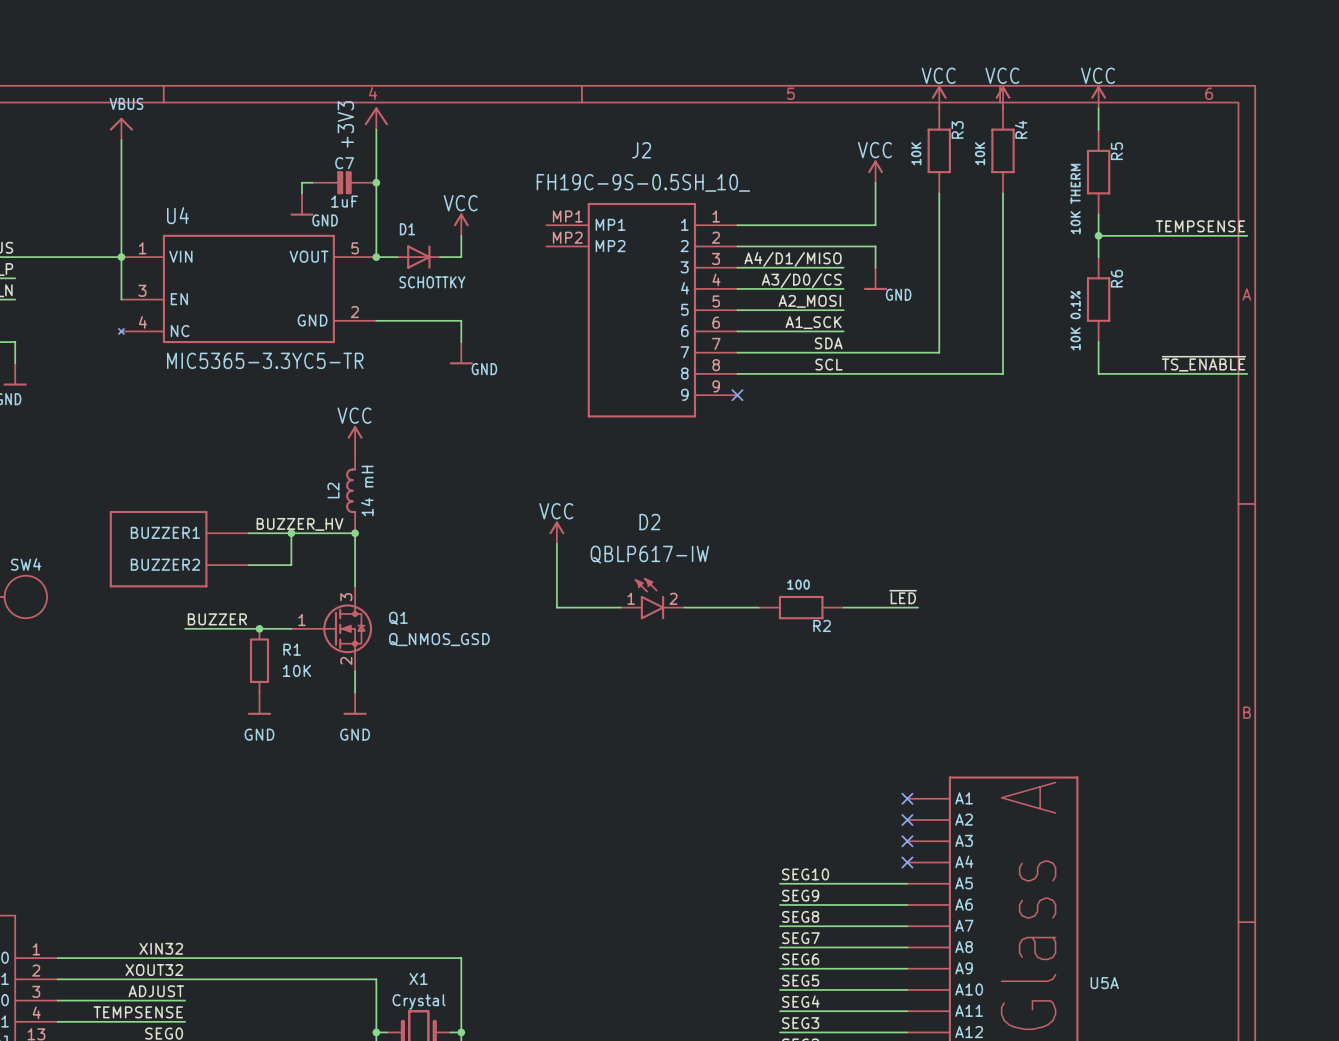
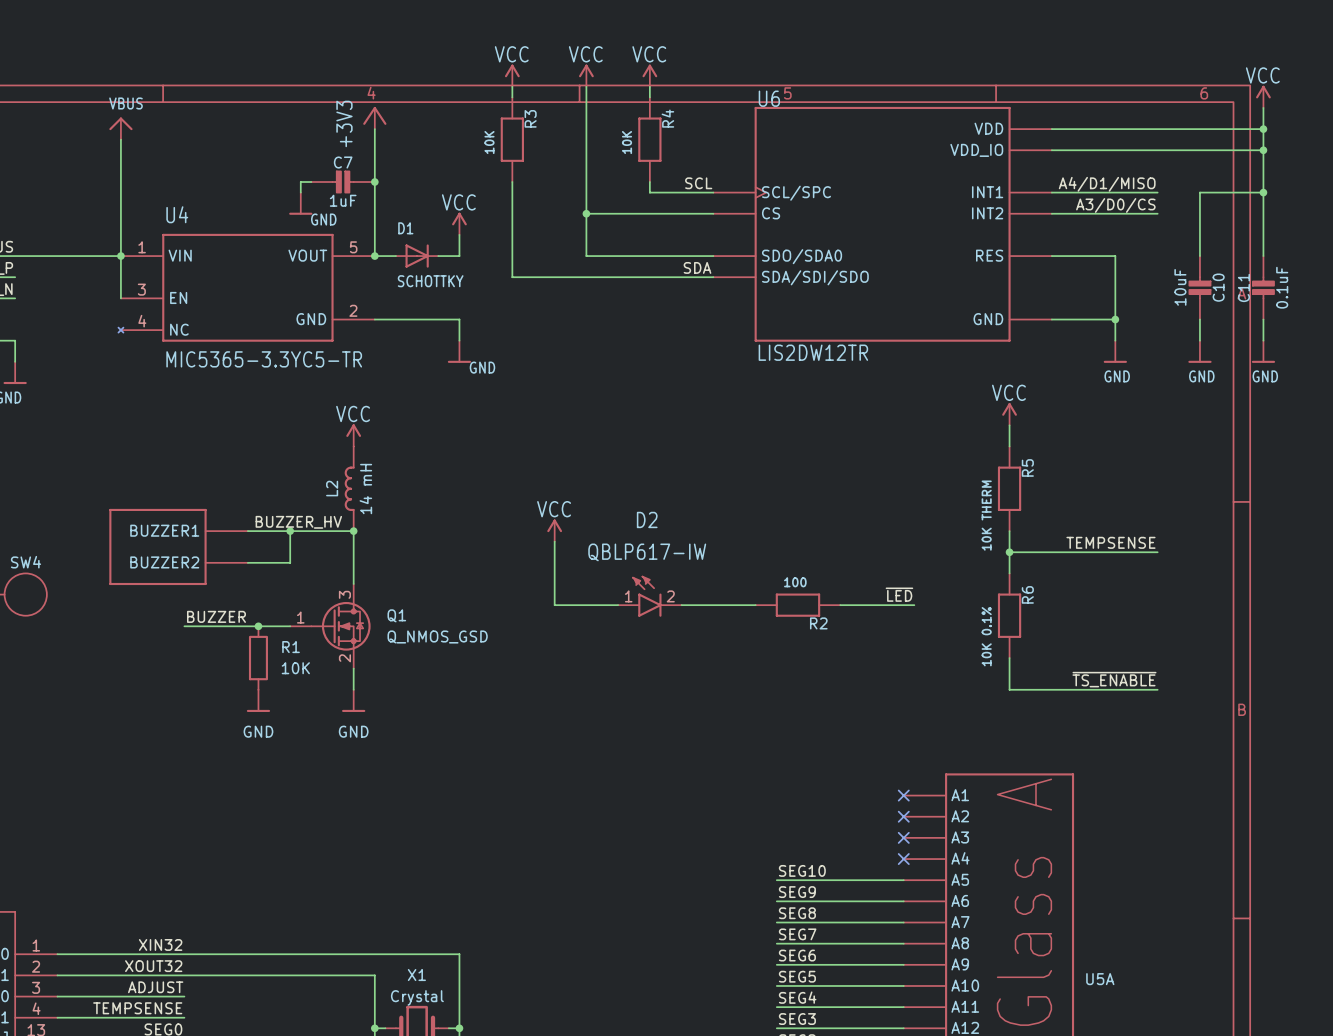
power symbol: none -> VCC (512, 75)
power symbol: none -> VCC (586, 75)
power symbol: none -> VCC (649, 75)
wire: none -> (512, 86) (512, 97)
wire: none -> (586, 86) (586, 256) (713, 256)
wire: none -> (649, 86) (649, 97)
power symbol: VCC (939, 97) -> none
power symbol: VCC (1003, 97) -> none
power symbol: VCC (1098, 97) -> none
power symbol: none -> VCC (1263, 96)
wire: (1098, 108) (1098, 129) -> none
wire: none -> (1263, 107) (1263, 256)
wire: none -> (1051, 129) (1263, 129)
junction: none -> (1263, 129)
R3 position: (939, 150) -> (512, 139)
R4 position: (1003, 150) -> (649, 139)
wire: none -> (1051, 150) (1263, 150)
junction: none -> (1263, 150)
power symbol: VCC (875, 171) -> none
R5 position: (1098, 172) -> (1009, 488)
wire: none -> (512, 182) (512, 277) (713, 277)
wire: none -> (649, 182) (649, 192) (713, 192)
wire: (875, 182) (875, 225) (737, 225) -> none
label: none -> SCL (698, 183)
label: none -> A4/D1/MISO (1107, 184)
wire: (939, 193) (939, 352) (737, 352) -> none
wire: (1003, 193) (1003, 373) (737, 373) -> none
wire: none -> (1051, 192) (1157, 192)
wire: none -> (1263, 192) (1199, 192) (1199, 256)
junction: none -> (1263, 192)
label: none -> A3/D0/CS (1115, 205)
wire: none -> (586, 213) (713, 213)
junction: none -> (586, 213)
wire: none -> (1051, 213) (1157, 213)
wire: (1098, 214) (1098, 257) -> none
U6: none -> LIS2DW12TR (882, 224)
label: TEMPSENSE (1200, 226) -> none
wire: (1098, 235) (1247, 235) -> none
junction: (1098, 235) -> none
wire: (737, 246) (875, 246) (875, 267) -> none
wire: none -> (1051, 256) (1115, 256) (1115, 340)
label: A4/D1/MISO (793, 259) -> none
wire: (737, 267) (843, 267) -> none
power symbol: GND (875, 278) -> none
label: A3/D0/CS (801, 280) -> none
wire: (737, 288) (843, 288) -> none
C10: none -> 10uF (1199, 287)
C11: none -> 0.1uF (1263, 287)
R6 position: (1098, 299) -> (1009, 615)
label: A2_MOSI (809, 301) -> none
J2: FH19C-9S-0.5SH_10_ (641, 310) -> none
wire: (737, 310) (843, 310) -> none
wire: none -> (1051, 319) (1115, 319)
junction: none -> (1115, 319)
wire: none -> (1199, 319) (1199, 340)
wire: none -> (1263, 319) (1263, 340)
label: A1_SCK (813, 322) -> none
wire: (737, 331) (843, 331) -> none
wire: (1098, 342) (1098, 373) (1247, 373) -> none
label position: SDA (828, 343) -> SDA (697, 267)
power symbol: none -> GND (1115, 351)
power symbol: none -> GND (1199, 351)
power symbol: none -> GND (1263, 351)
label: ~{TS_ENABLE} (1203, 363) -> none
label: SCL (828, 364) -> none
no-connect mark: (737, 395) -> none
power symbol: none -> VCC (1009, 414)
wire: none -> (1009, 425) (1009, 446)
wire: none -> (1009, 531) (1009, 573)
label: none -> TEMPSENSE (1110, 542)
wire: none -> (1009, 552) (1157, 552)
junction: none -> (1009, 552)
wire: none -> (1009, 658) (1009, 689) (1157, 689)
label: none -> ~{TS_ENABLE} (1114, 679)

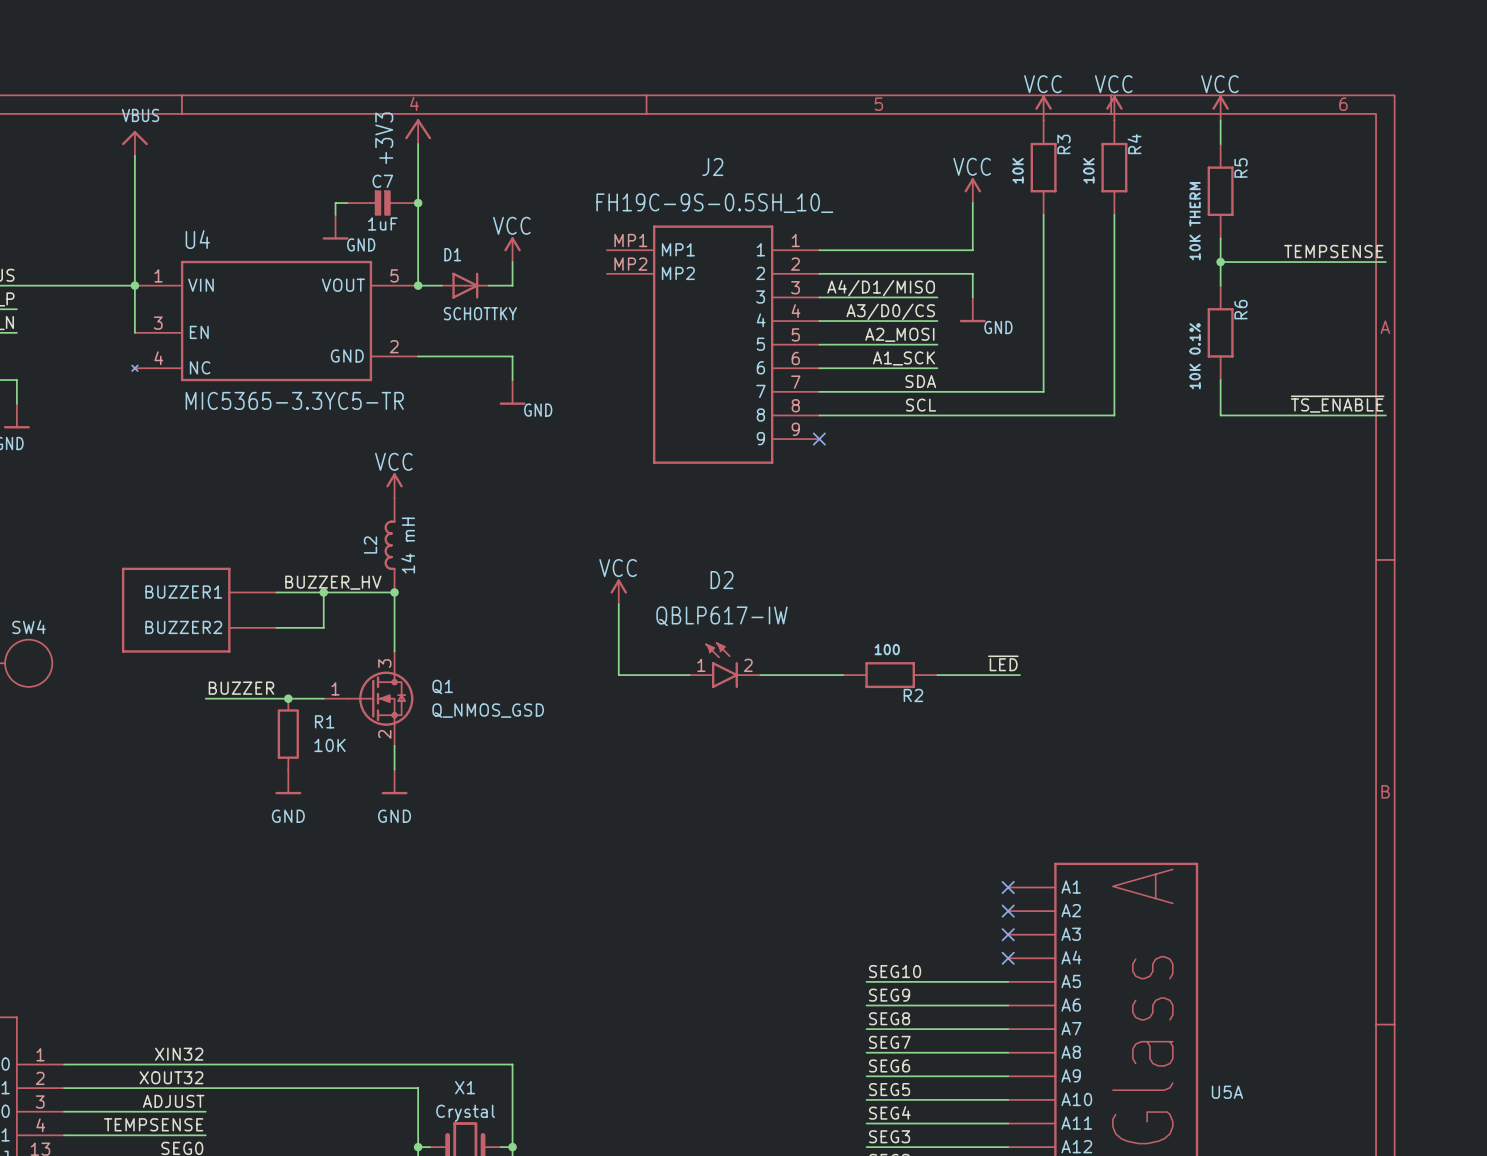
power symbol: VCC (512, 75) -> none
power symbol: VCC (586, 75) -> none
power symbol: VCC (649, 75) -> none
wire: (512, 86) (512, 97) -> none
wire: (586, 86) (586, 256) (713, 256) -> none
wire: (649, 86) (649, 97) -> none
power symbol: none -> VCC (1043, 108)
power symbol: none -> VCC (1114, 108)
power symbol: none -> VCC (1220, 108)
power symbol: VCC (1263, 96) -> none
wire: none -> (1220, 120) (1220, 144)
wire: (1263, 107) (1263, 256) -> none
wire: (1051, 129) (1263, 129) -> none
junction: (1263, 129) -> none
R3 position: (512, 139) -> (1043, 167)
R4 position: (649, 139) -> (1114, 167)
wire: (1051, 150) (1263, 150) -> none
junction: (1263, 150) -> none
power symbol: none -> VCC (972, 190)
wire: (512, 182) (512, 277) (713, 277) -> none
wire: (649, 182) (649, 192) (713, 192) -> none
wire: none -> (972, 203) (972, 250) (819, 250)
label: SCL (698, 183) -> none
label: A4/D1/MISO (1107, 184) -> none
wire: none -> (1043, 214) (1043, 391) (819, 391)
wire: none -> (1114, 214) (1114, 415) (819, 415)
wire: (1051, 192) (1157, 192) -> none
wire: (1263, 192) (1199, 192) (1199, 256) -> none
junction: (1263, 192) -> none
label: A3/D0/CS (1115, 205) -> none
wire: (586, 213) (713, 213) -> none
junction: (586, 213) -> none
wire: (1051, 213) (1157, 213) -> none
wire: none -> (1220, 238) (1220, 285)
U6: LIS2DW12TR (882, 224) -> none
label: none -> TEMPSENSE (1333, 251)
wire: none -> (1220, 262) (1385, 262)
junction: none -> (1220, 262)
wire: none -> (819, 273) (972, 273) (972, 297)
wire: (1051, 256) (1115, 256) (1115, 340) -> none
label: none -> A4/D1/MISO (881, 288)
wire: none -> (819, 297) (937, 297)
label position: SDA (697, 267) -> SDA (920, 381)
power symbol: none -> GND (972, 309)
label: none -> A3/D0/CS (890, 311)
wire: none -> (819, 321) (937, 321)
C10: 10uF (1199, 287) -> none
C11: 0.1uF (1263, 287) -> none
label: none -> A2_MOSI (899, 334)
J2: none -> FH19C-9S-0.5SH_10_ (713, 344)
wire: none -> (819, 344) (937, 344)
wire: (1051, 319) (1115, 319) -> none
junction: (1115, 319) -> none
wire: (1199, 319) (1199, 340) -> none
wire: (1263, 319) (1263, 340) -> none
label: none -> A1_SCK (903, 358)
wire: none -> (819, 368) (937, 368)
wire: none -> (1220, 380) (1220, 415) (1385, 415)
power symbol: GND (1115, 351) -> none
power symbol: GND (1199, 351) -> none
power symbol: GND (1263, 351) -> none
label: none -> ~{TS_ENABLE} (1337, 404)
label: none -> SCL (921, 405)
no-connect mark: none -> (819, 439)
power symbol: VCC (1009, 414) -> none
wire: (1009, 425) (1009, 446) -> none
R5 position: (1009, 488) -> (1220, 191)
wire: (1009, 531) (1009, 573) -> none
label: TEMPSENSE (1110, 542) -> none
wire: (1009, 552) (1157, 552) -> none
junction: (1009, 552) -> none
R6 position: (1009, 615) -> (1220, 332)
wire: (1009, 658) (1009, 689) (1157, 689) -> none
label: ~{TS_ENABLE} (1114, 679) -> none

